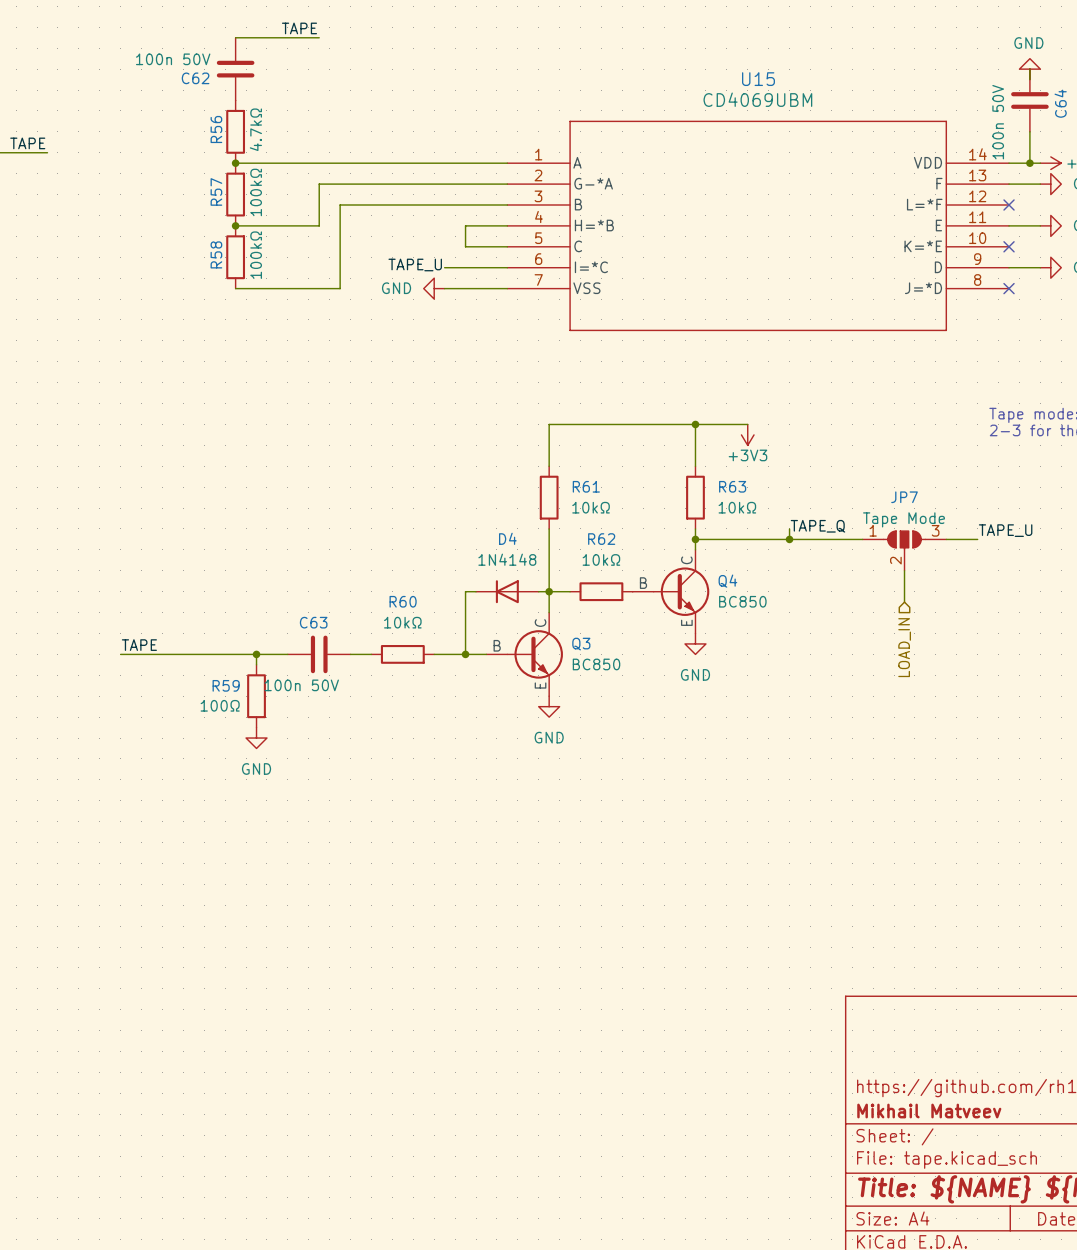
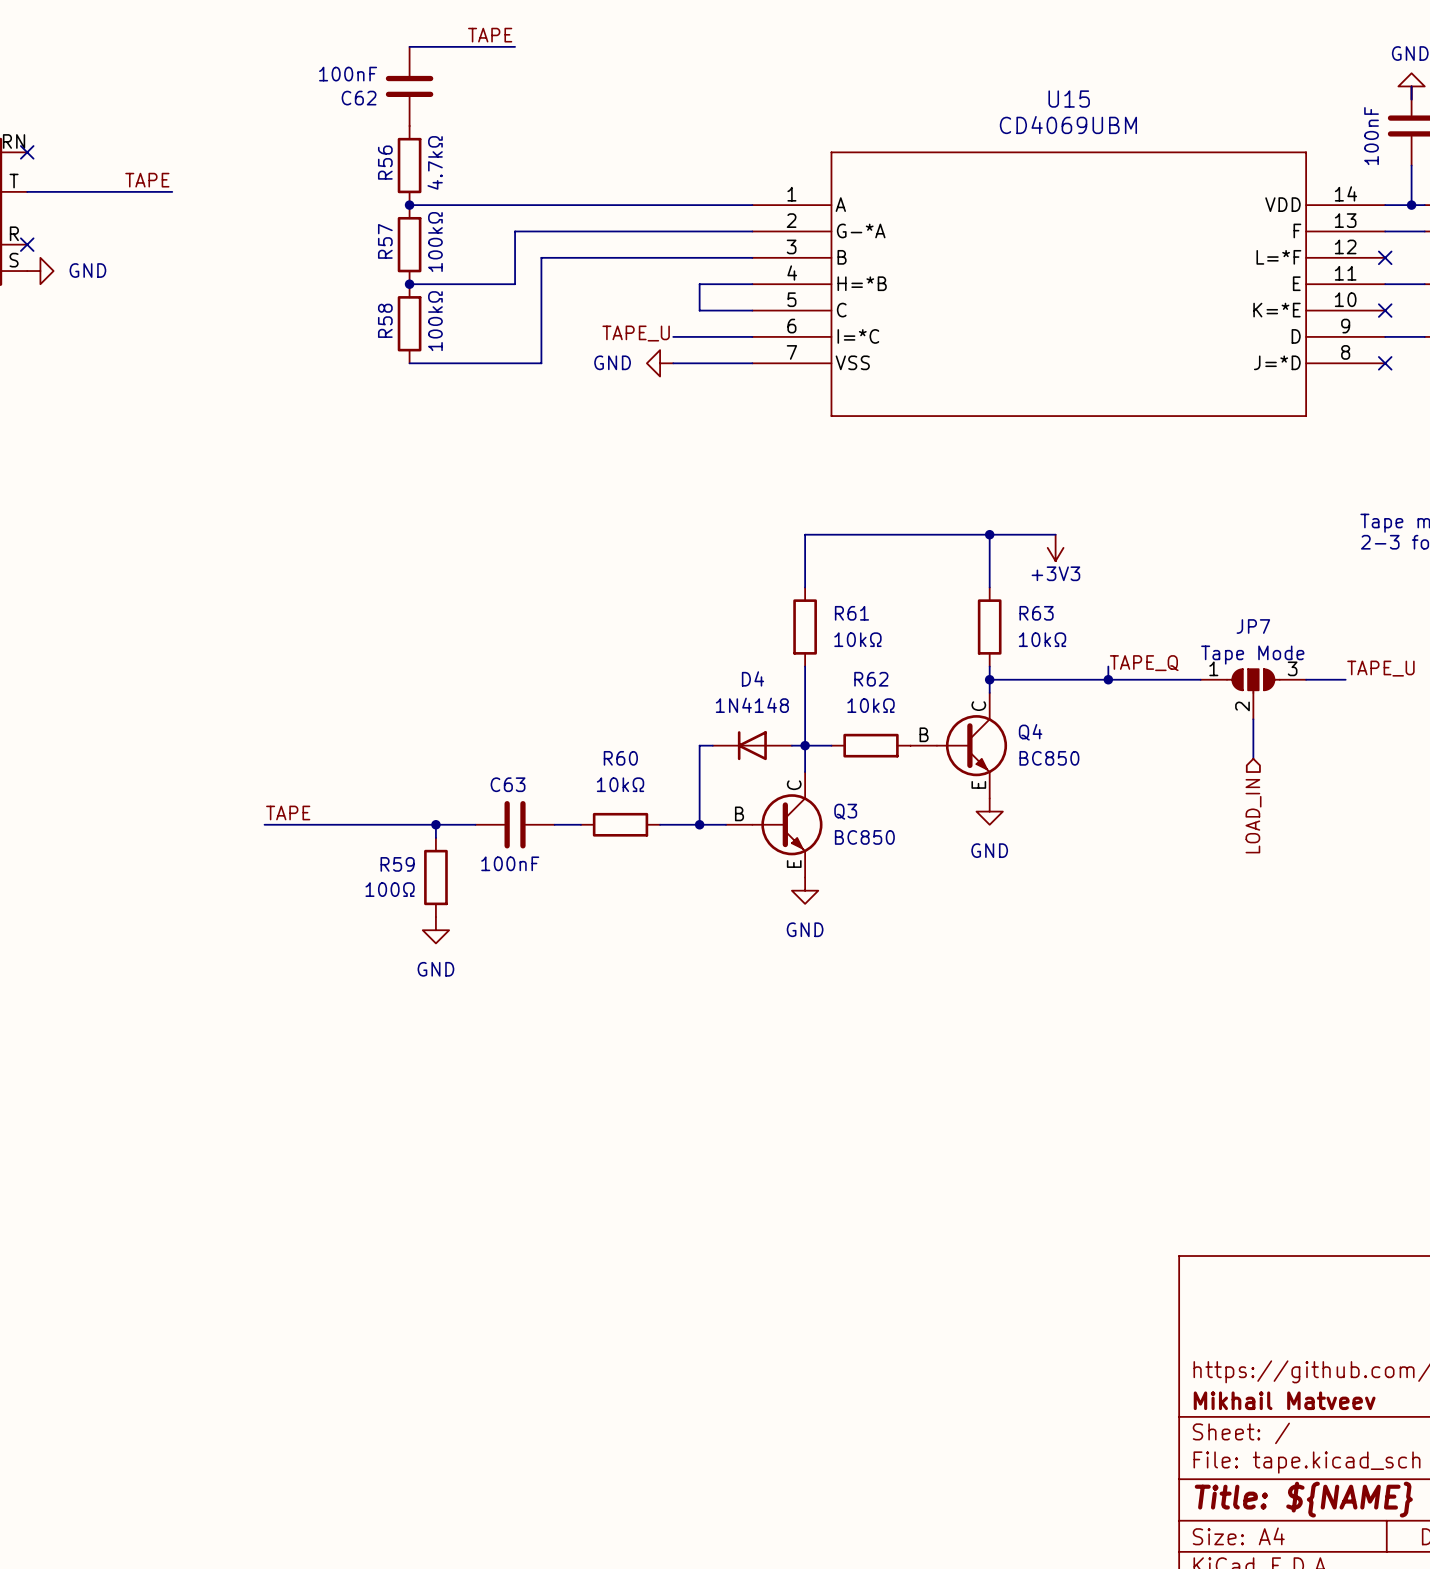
C62 value: 100n 50V (173, 59) -> 100nF (348, 74)
C64 value: 100n 50V (998, 122) -> 100nF (1371, 136)
C63 value: 100n 50V (301, 685) -> 100nF (510, 863)

